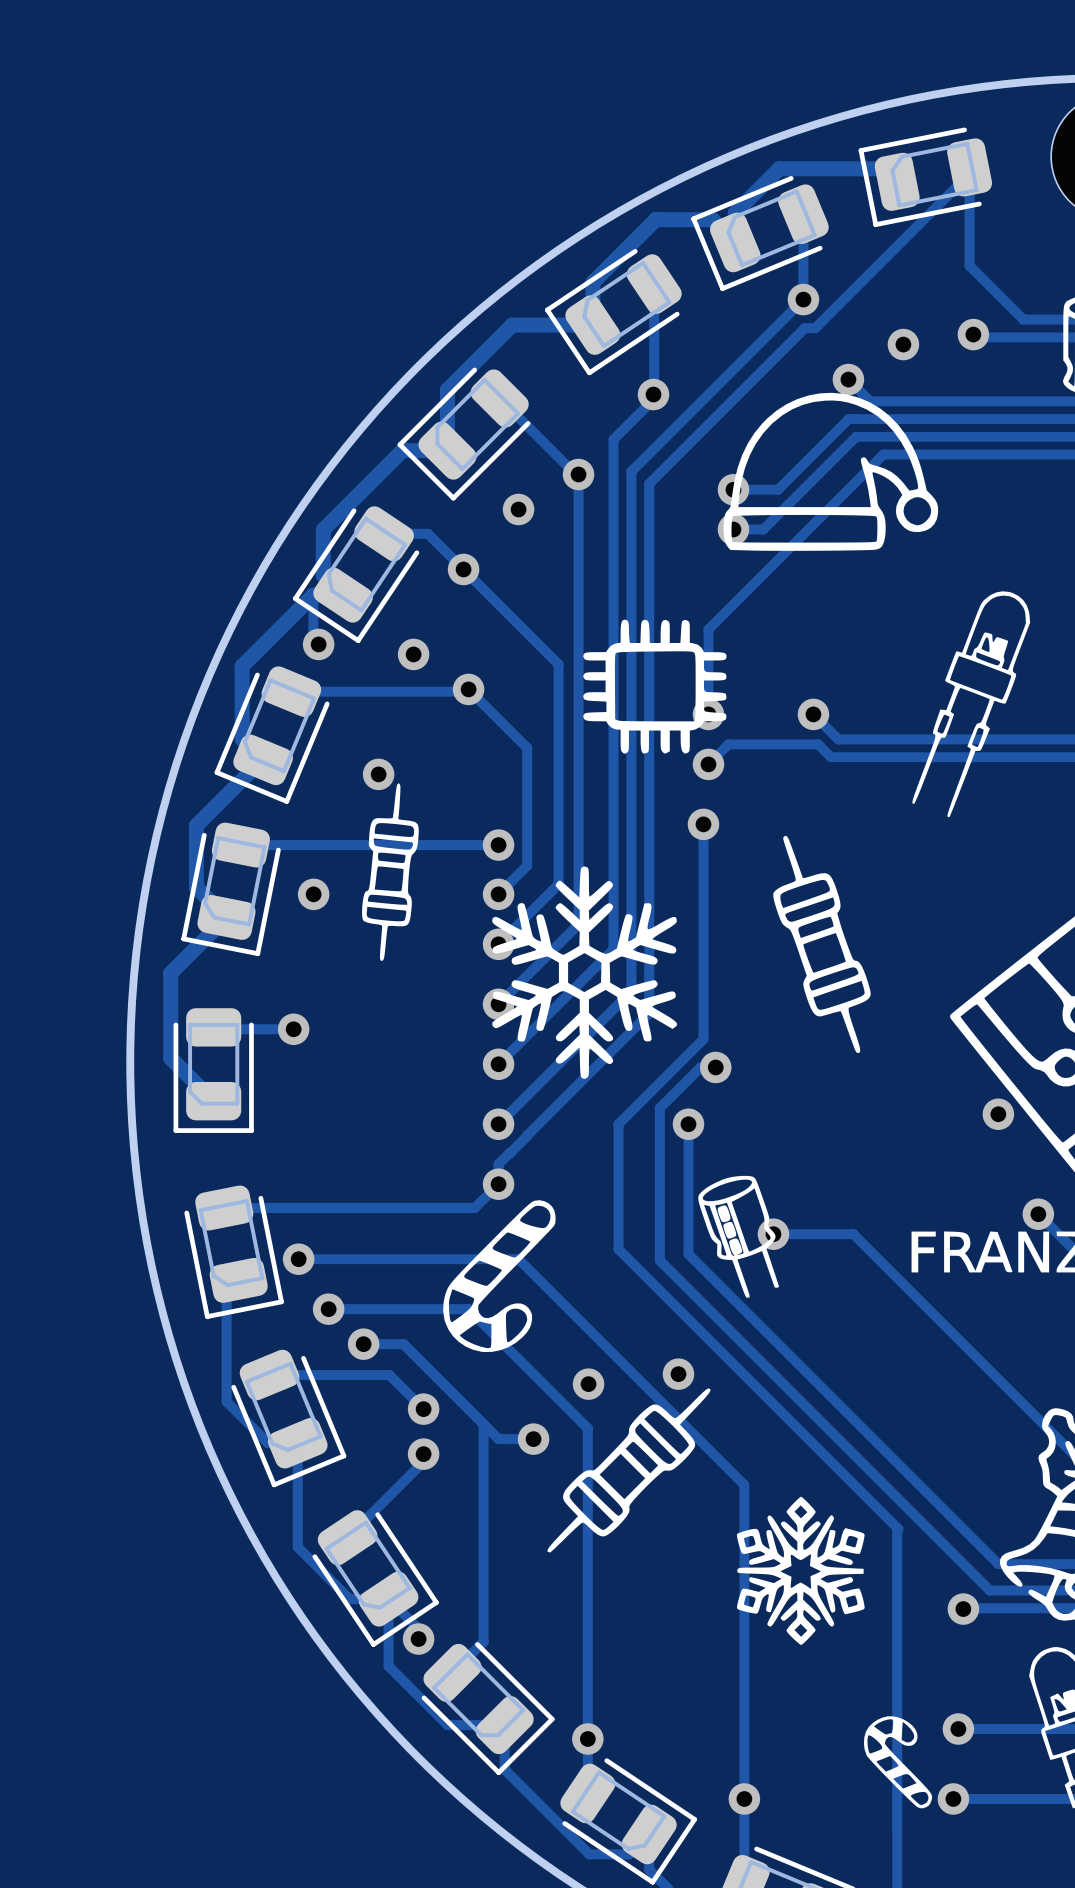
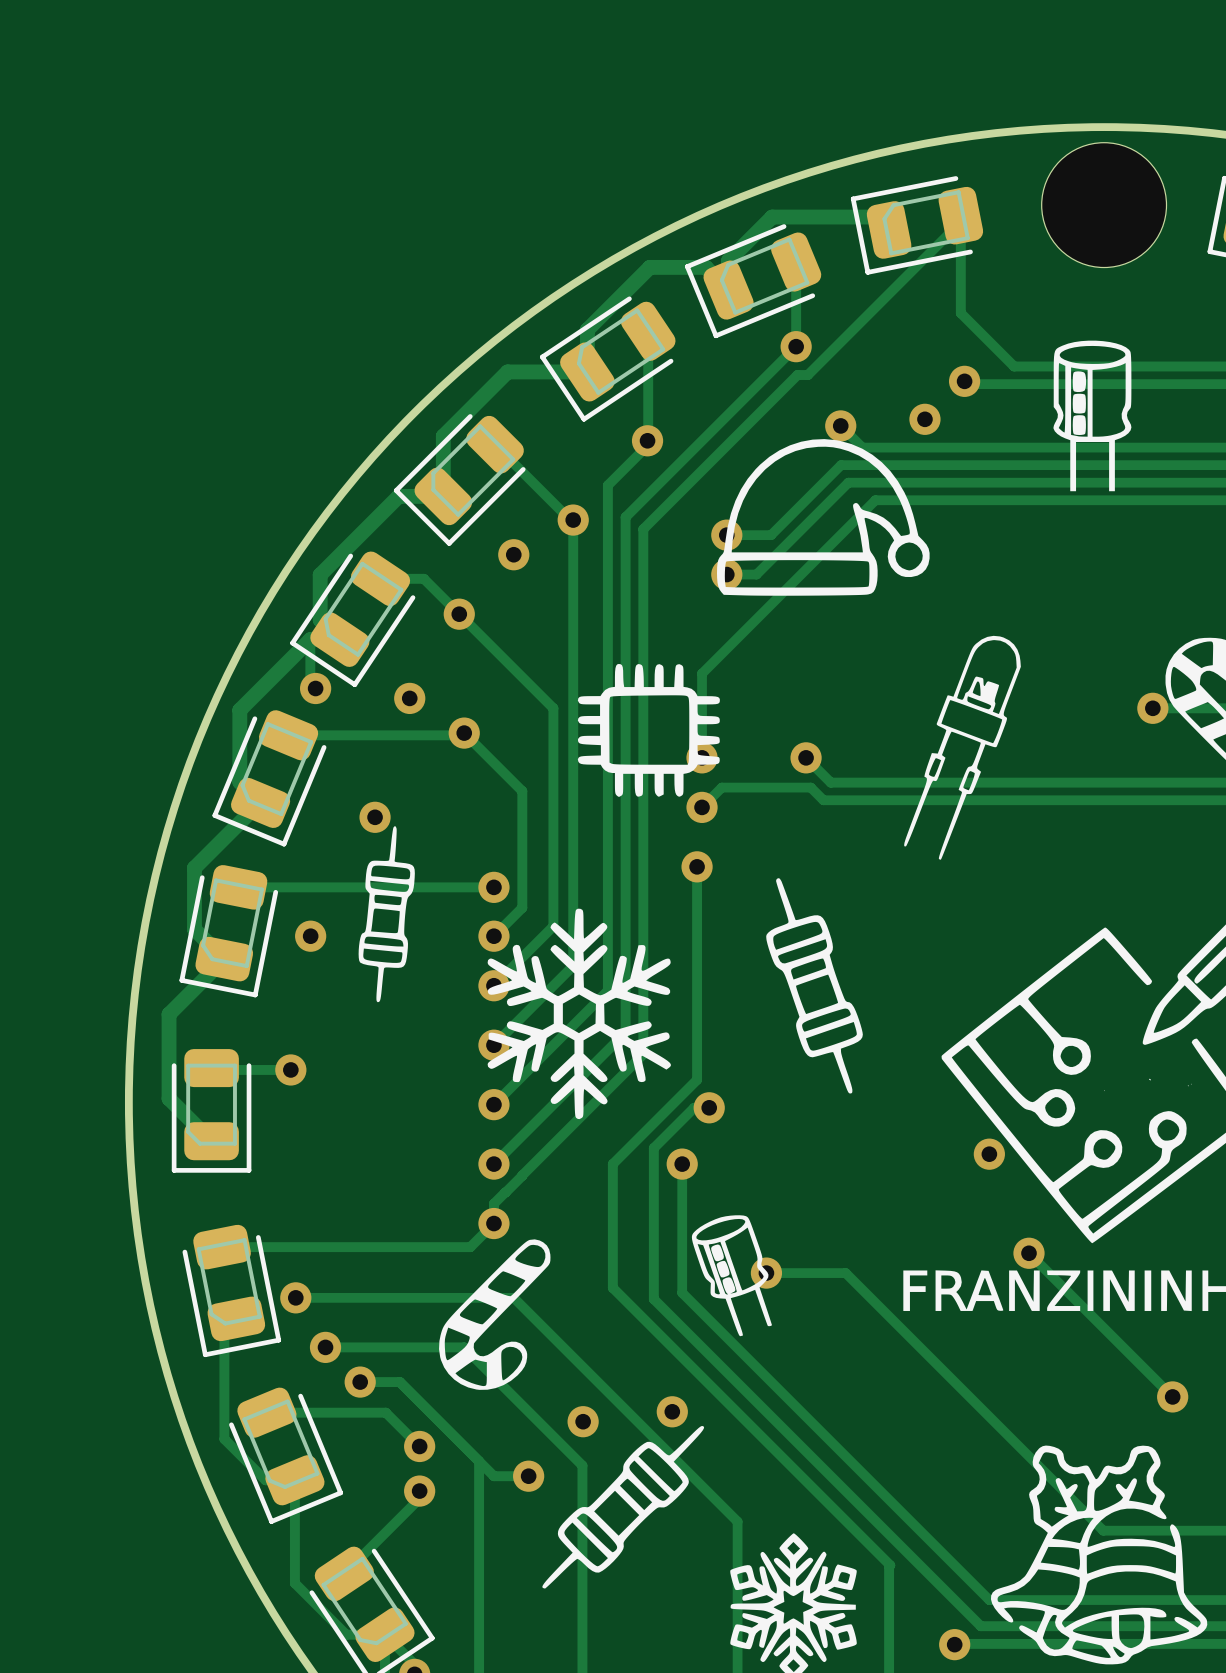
via position: (903, 344) -> (924, 419)

